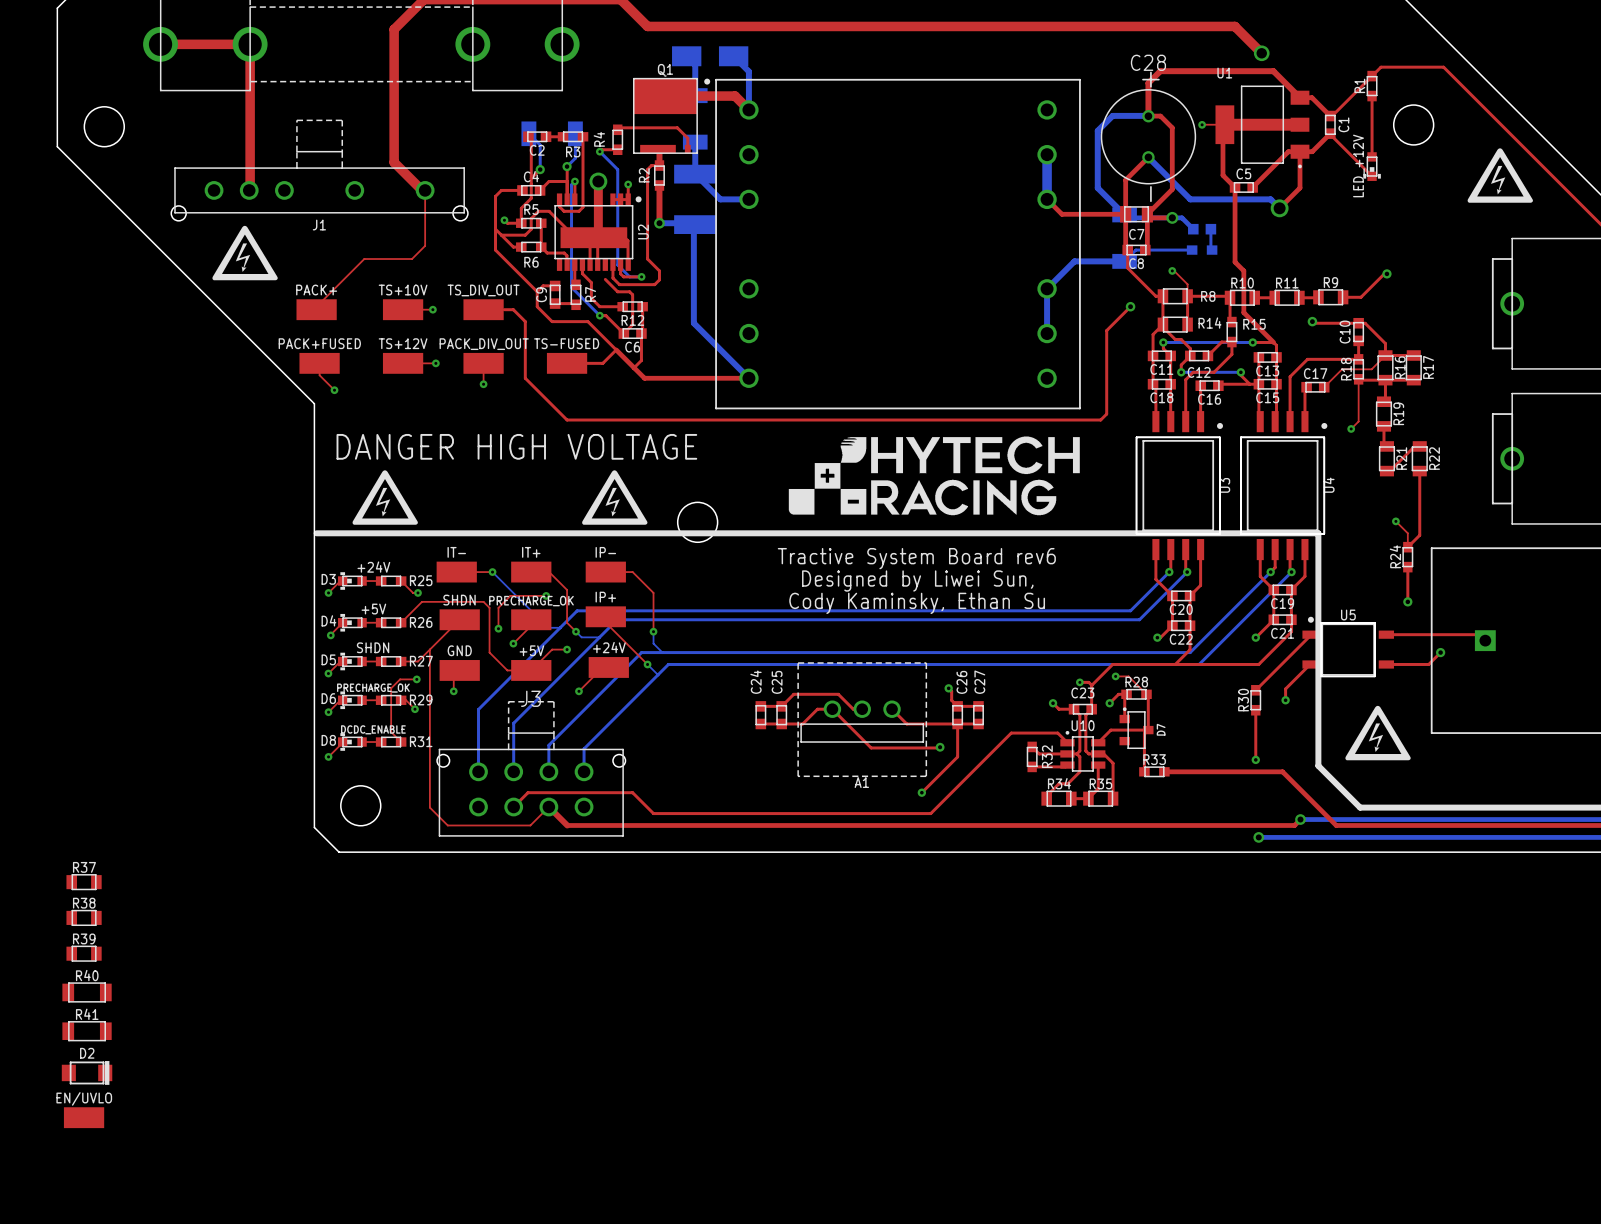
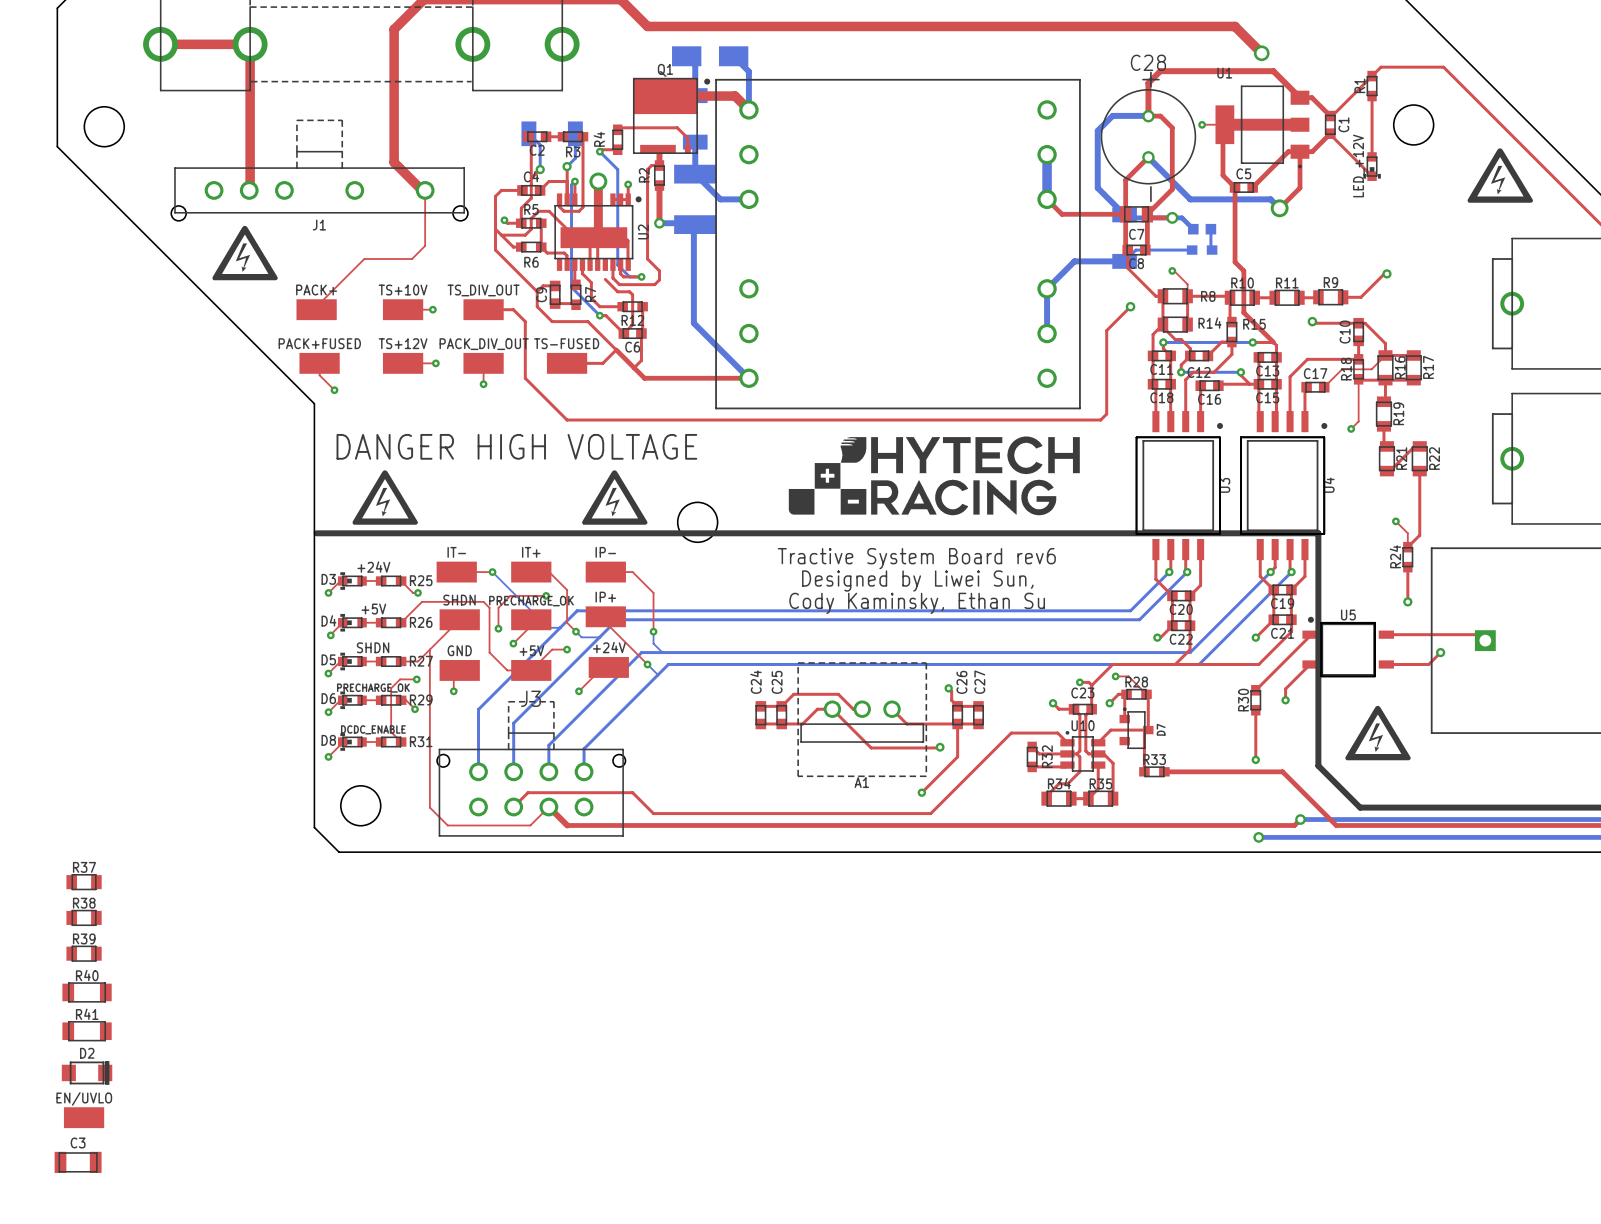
C3: none -> (78, 1162)

